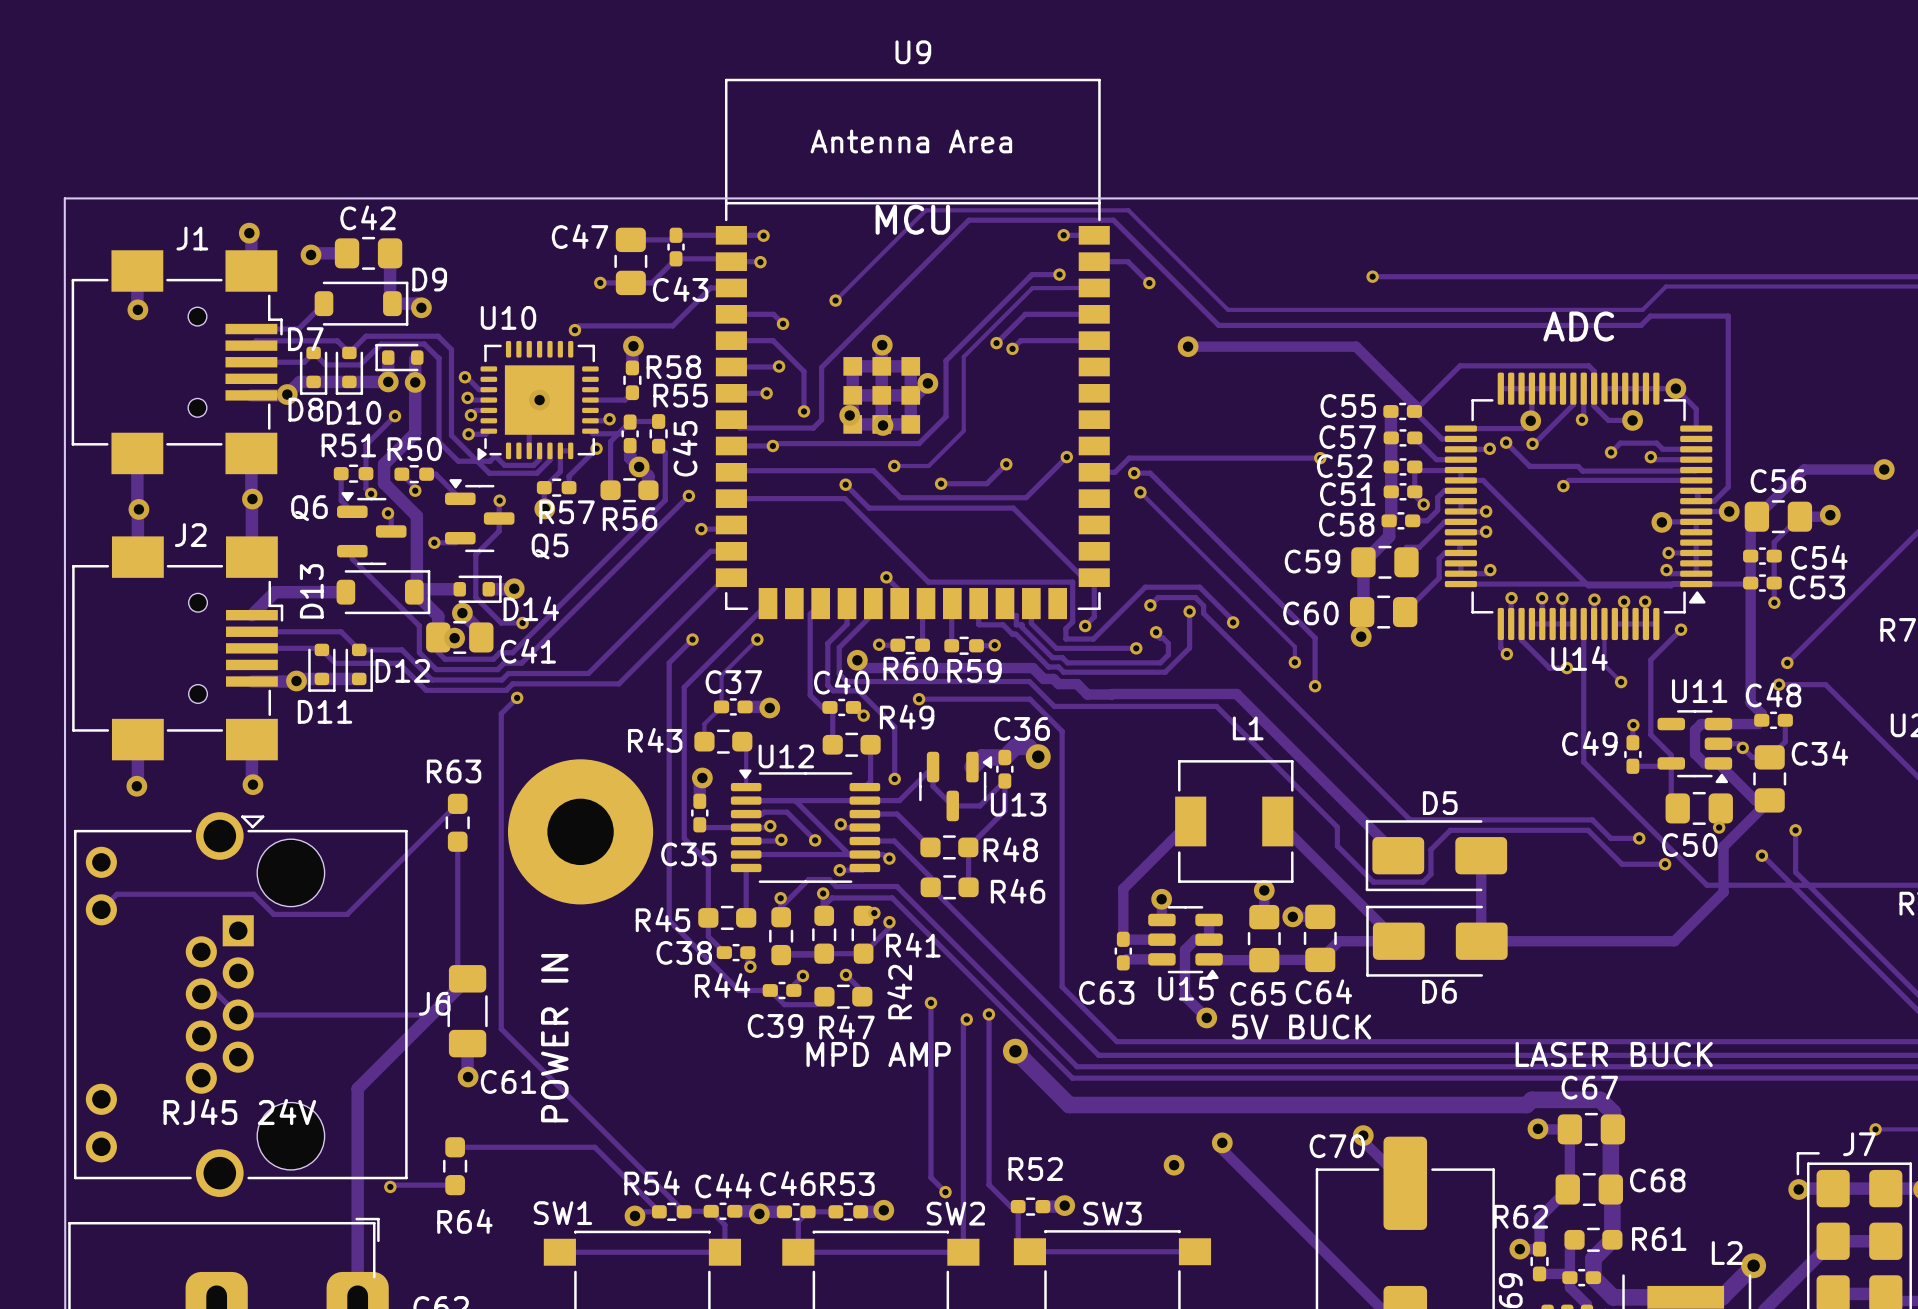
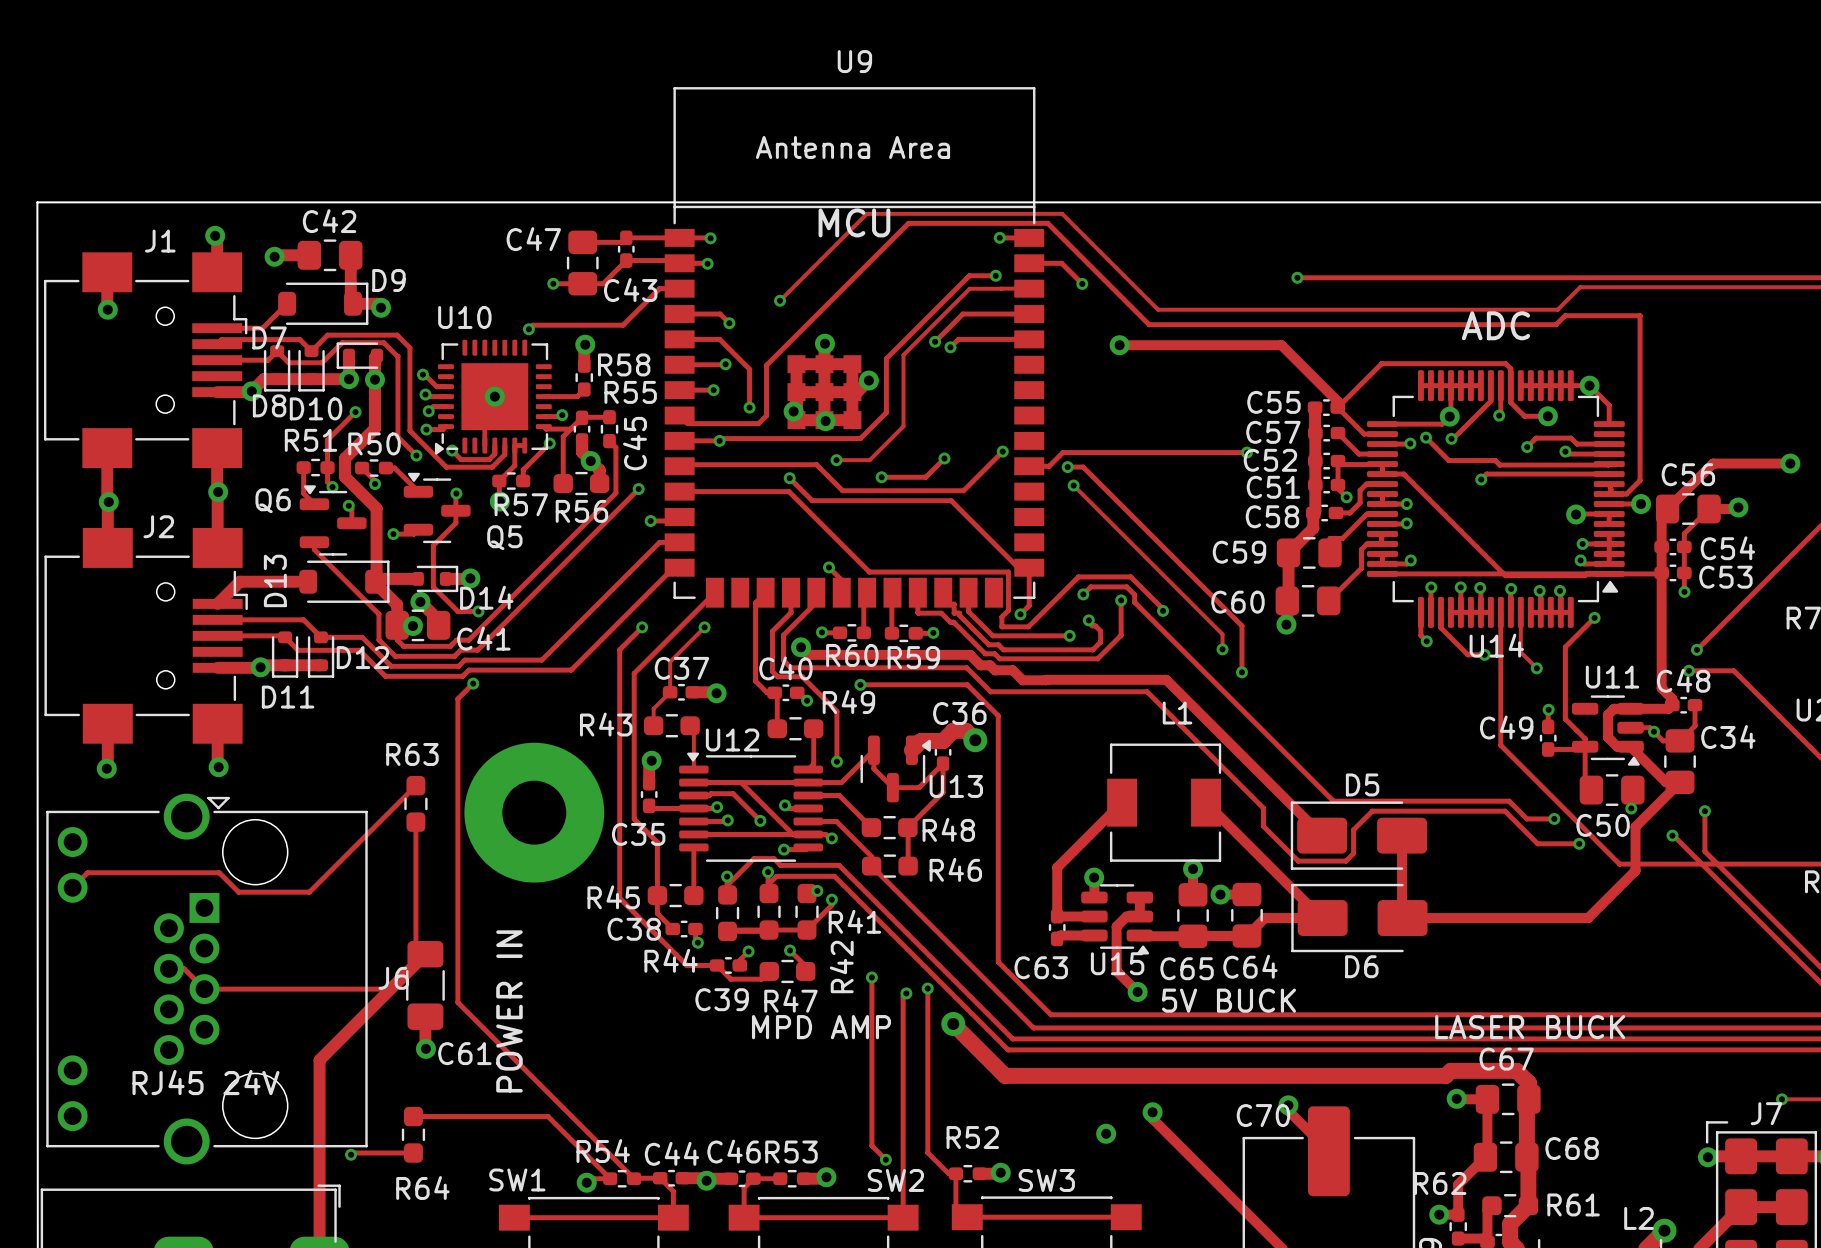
track: (495, 456) (490, 461) (458, 461) -> none
via: none -> (452, 450)
via: none -> (416, 455)

